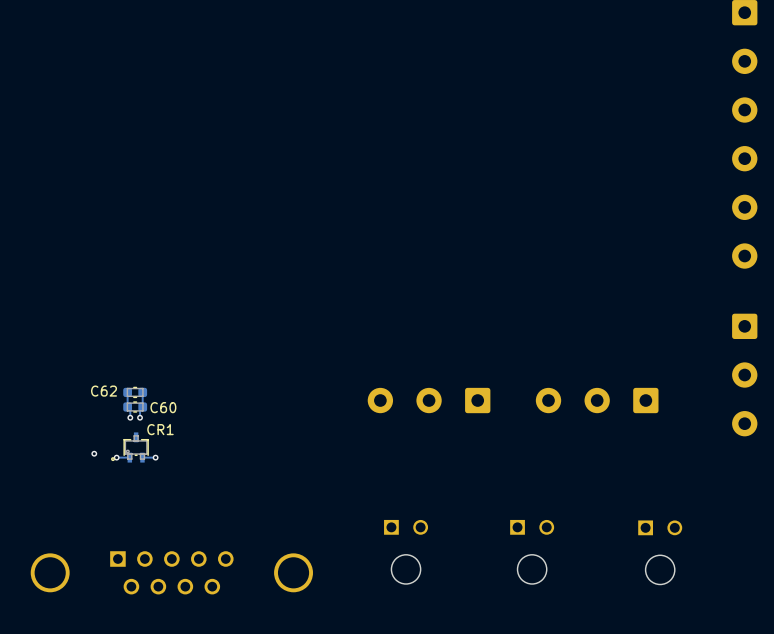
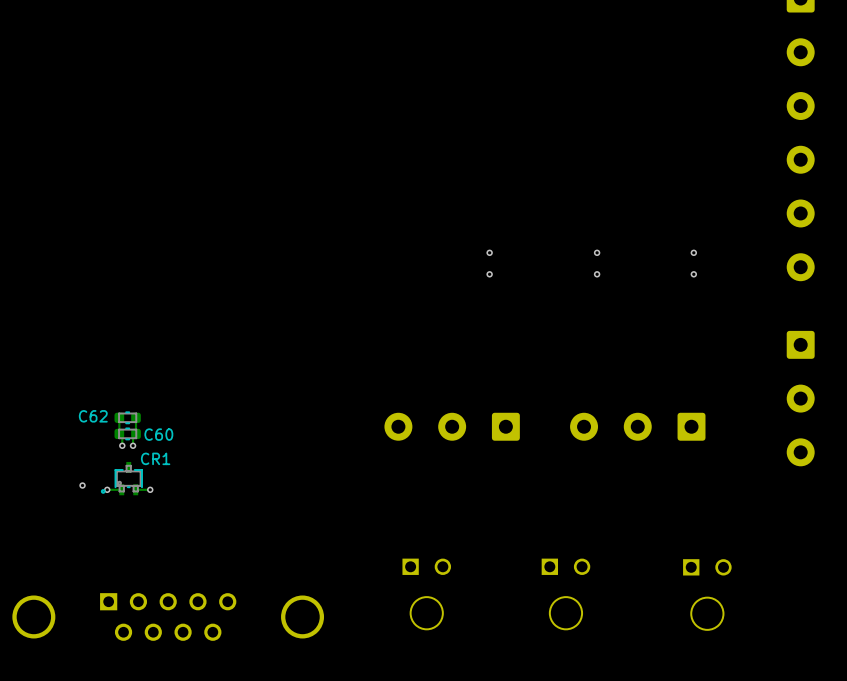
via: none -> (489, 252)
via: none -> (597, 252)
via: none -> (693, 252)
via: none -> (489, 274)
via: none -> (597, 274)
via: none -> (693, 274)

